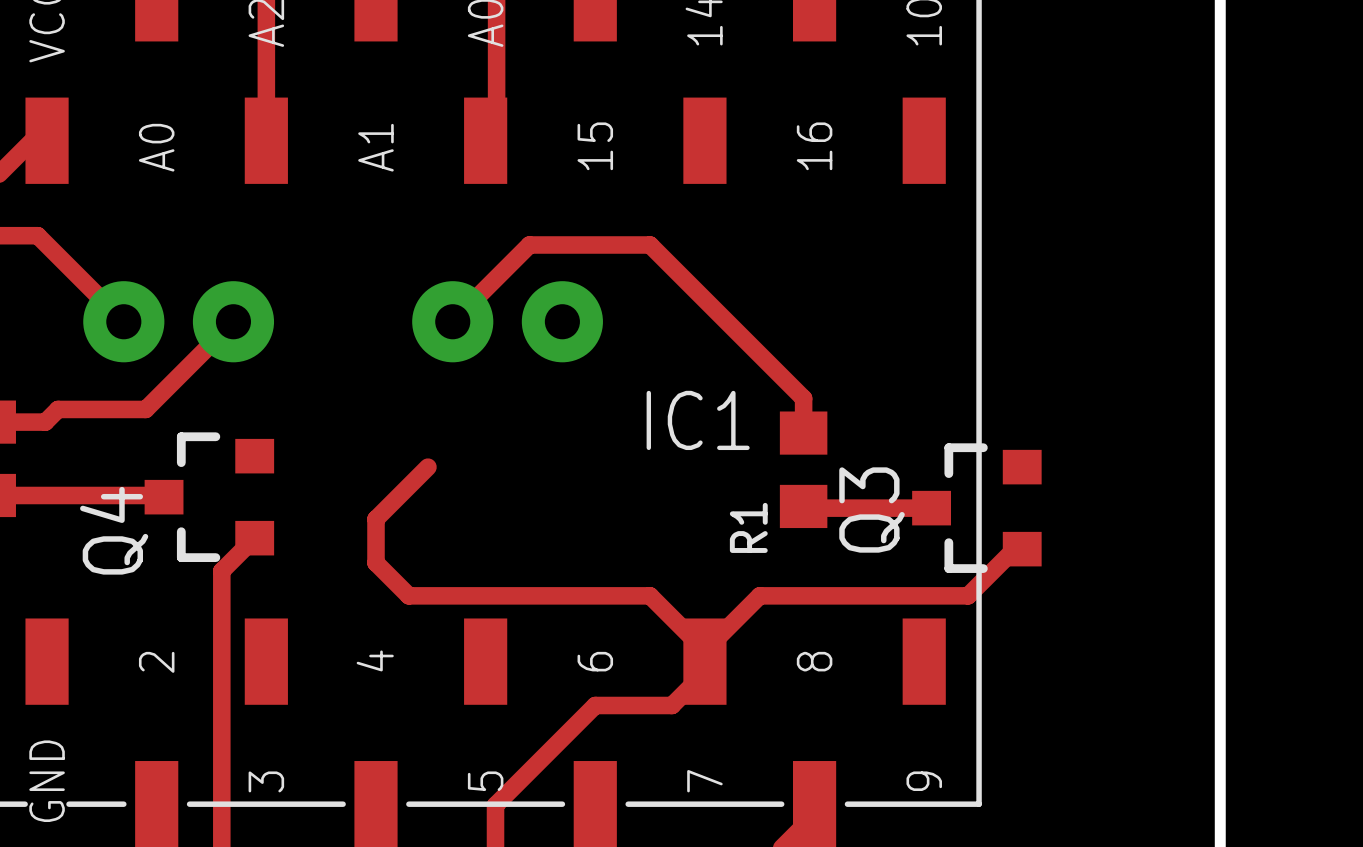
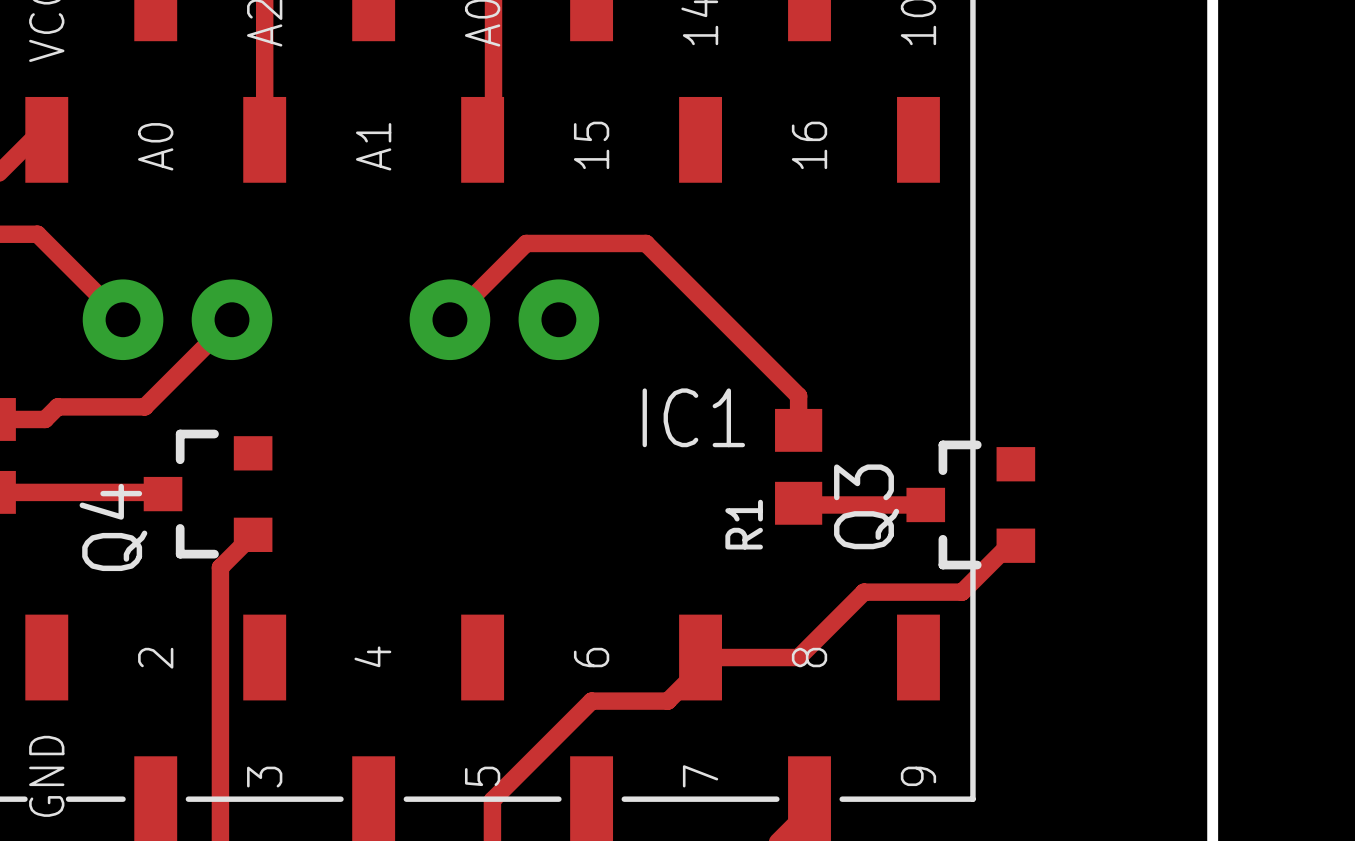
track: (427, 467) (376, 519) (376, 562) (408, 595) (650, 595) (704, 650) -> none
track: (869, 595) (759, 595) (704, 650) -> (863, 592) (798, 657) (700, 657)

